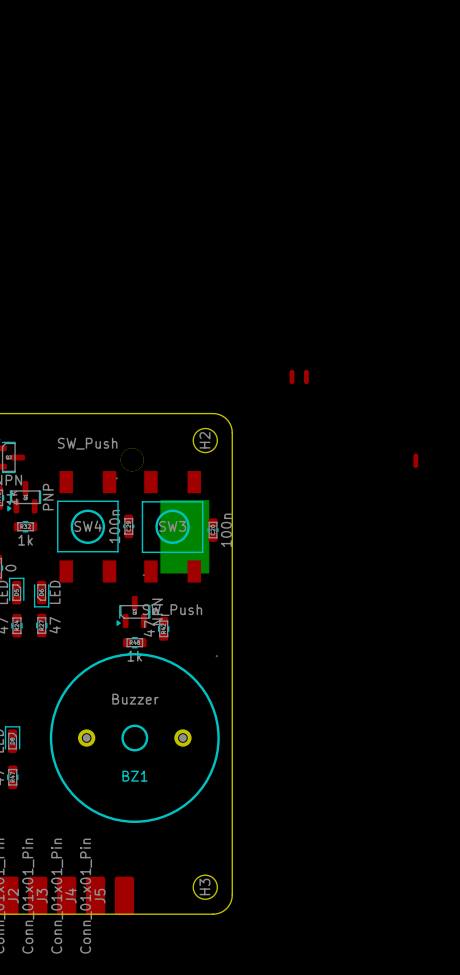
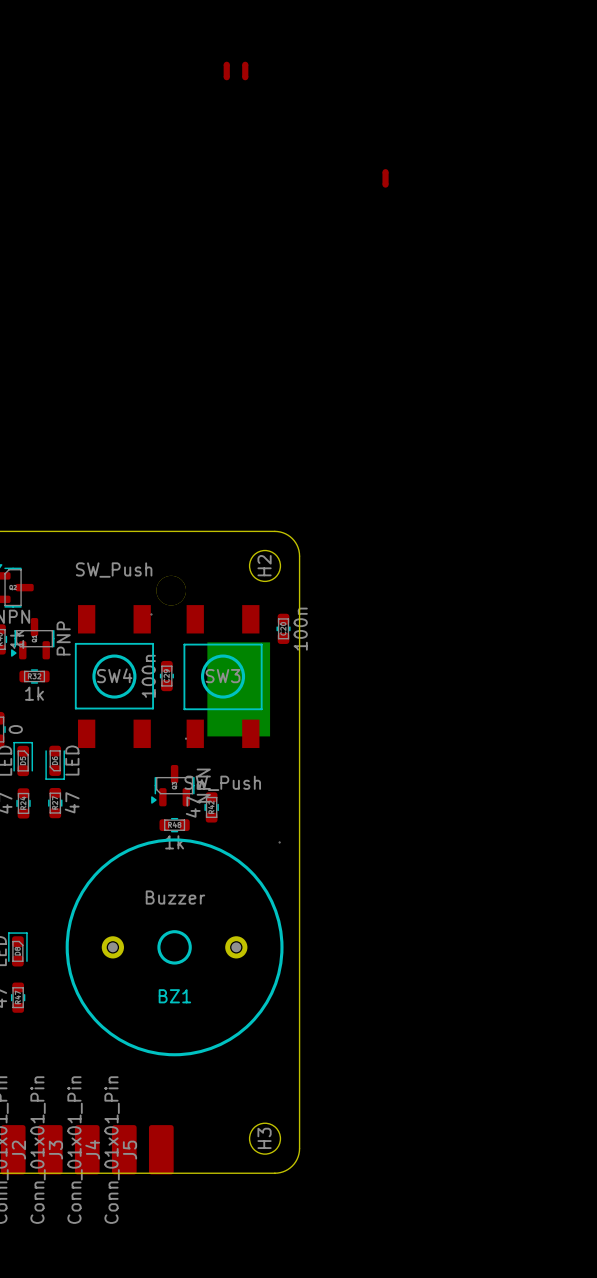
part: none -> (226, 70)
part: none -> (245, 70)
part: none -> (385, 178)
part: (291, 377) -> none
part: (306, 377) -> none
part: (415, 460) -> none
part position: (213, 530) -> (283, 628)

